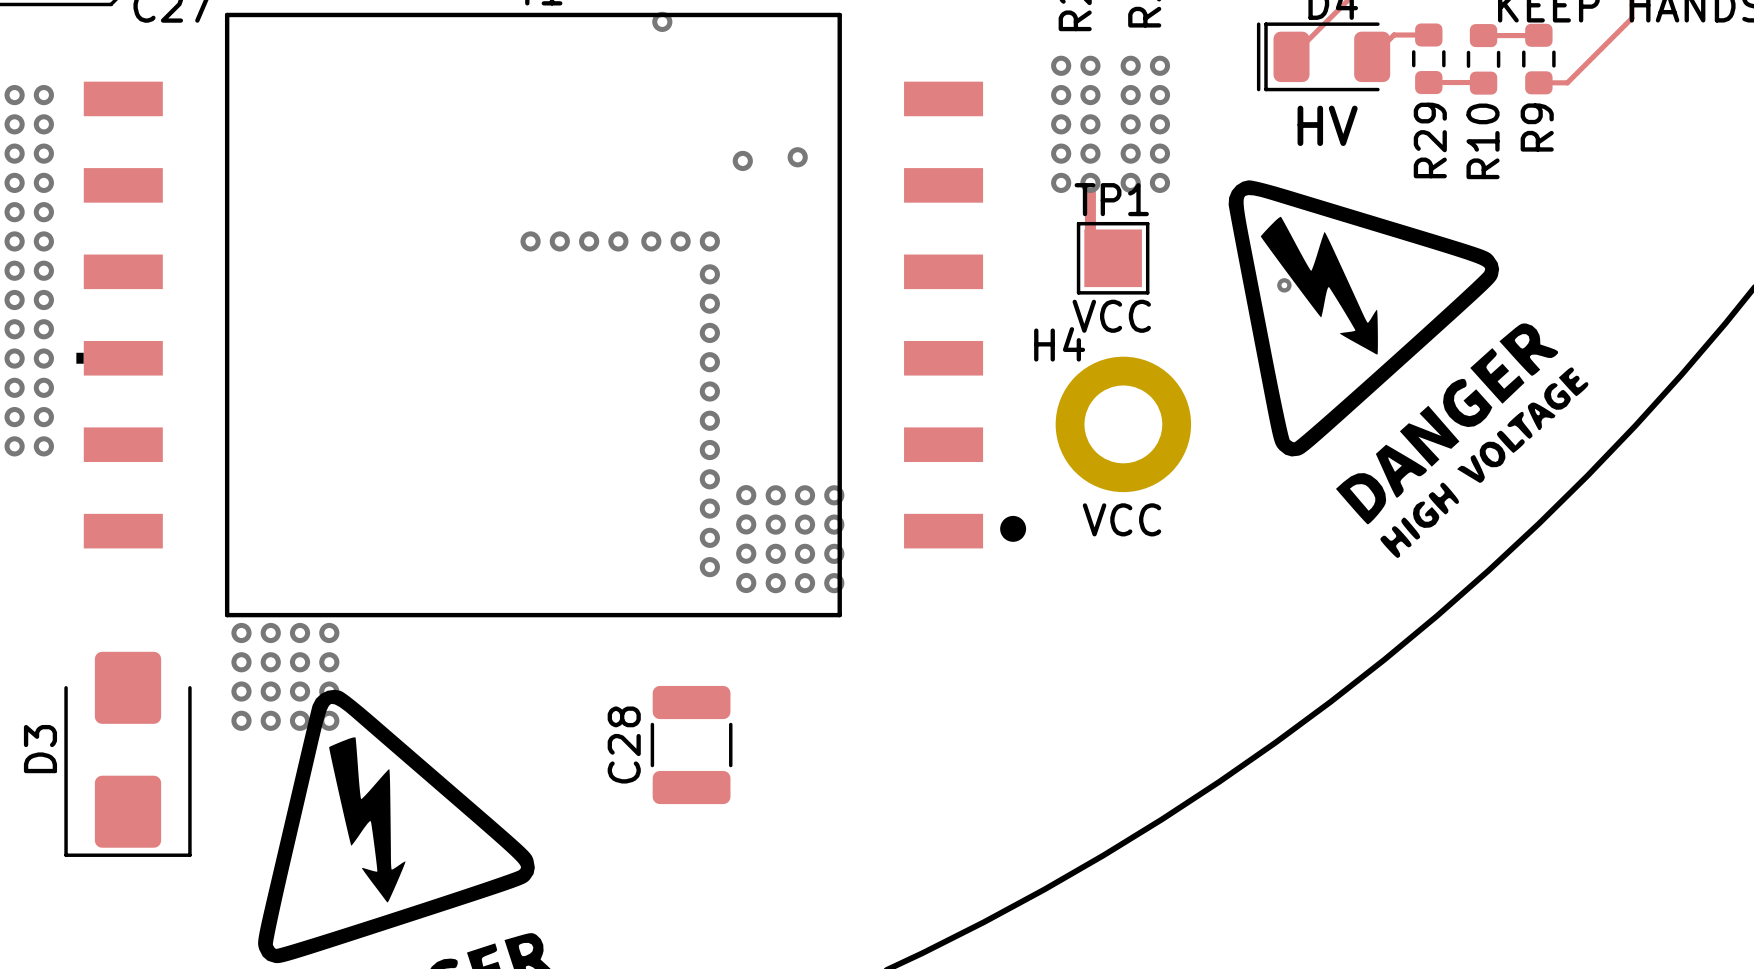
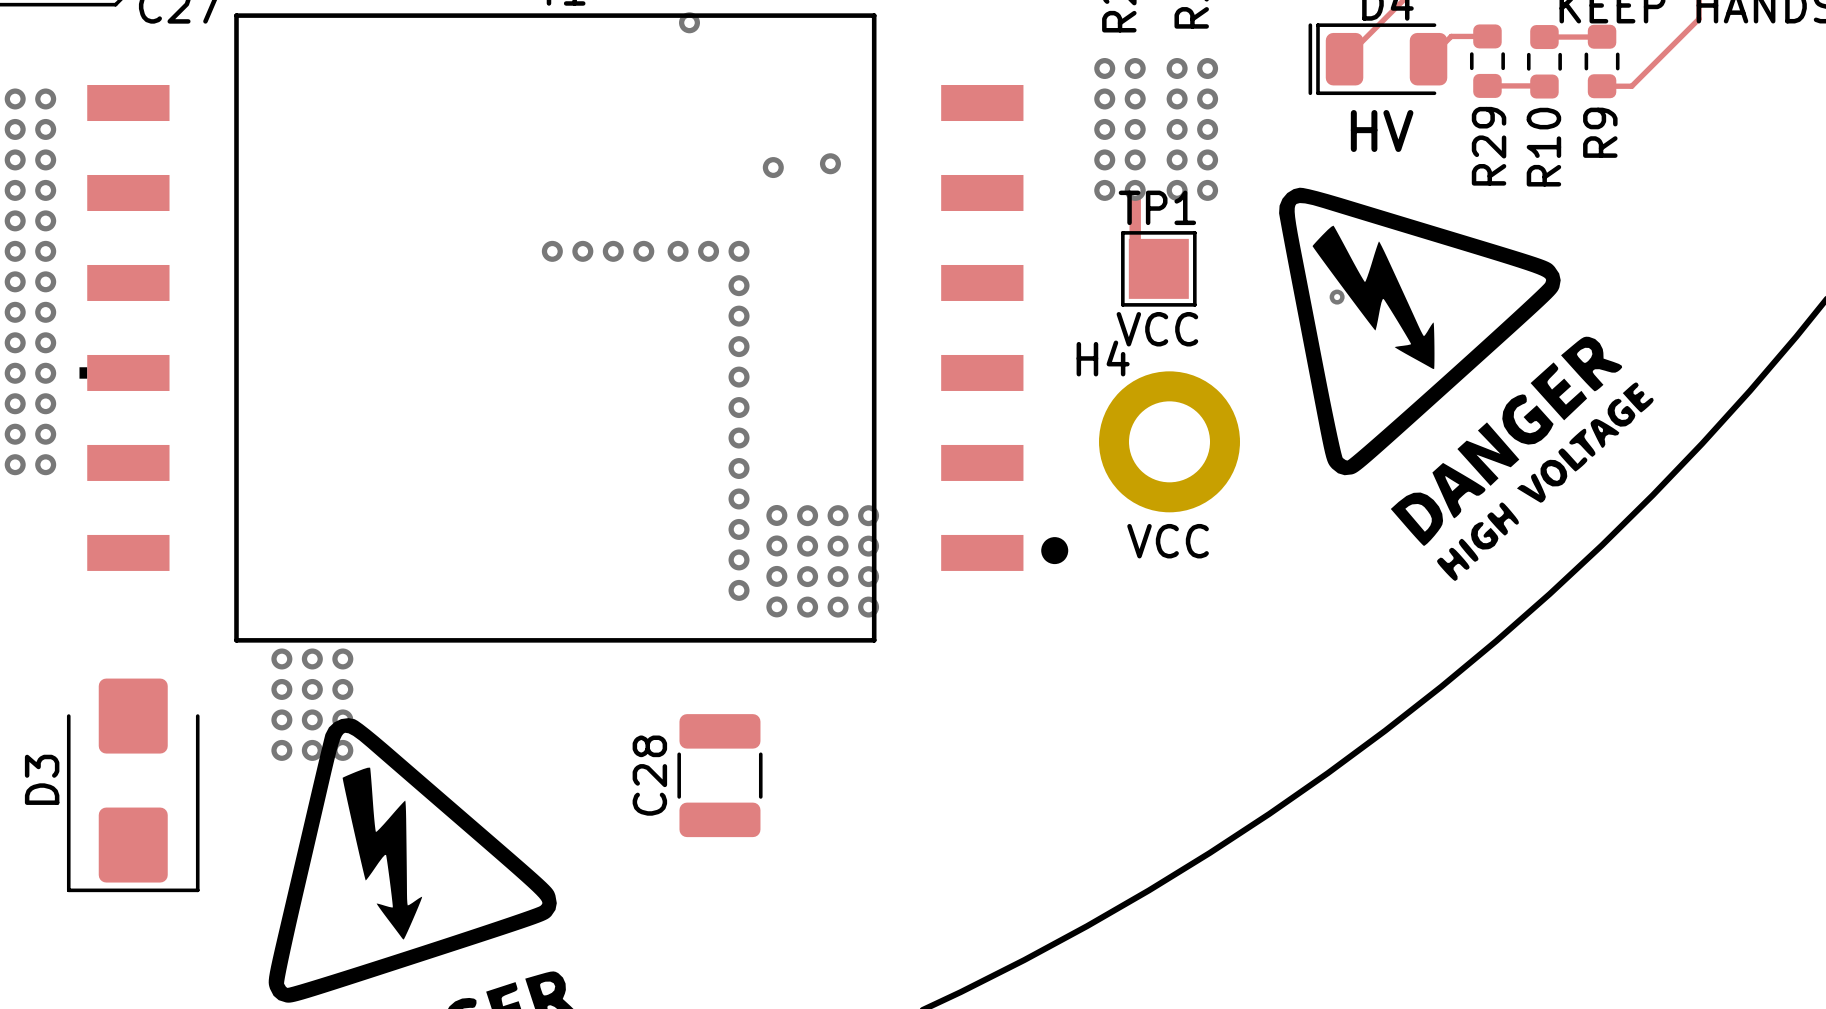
via: (241, 632) -> none
via: (241, 662) -> none
via: (241, 691) -> none
via: (241, 720) -> none

